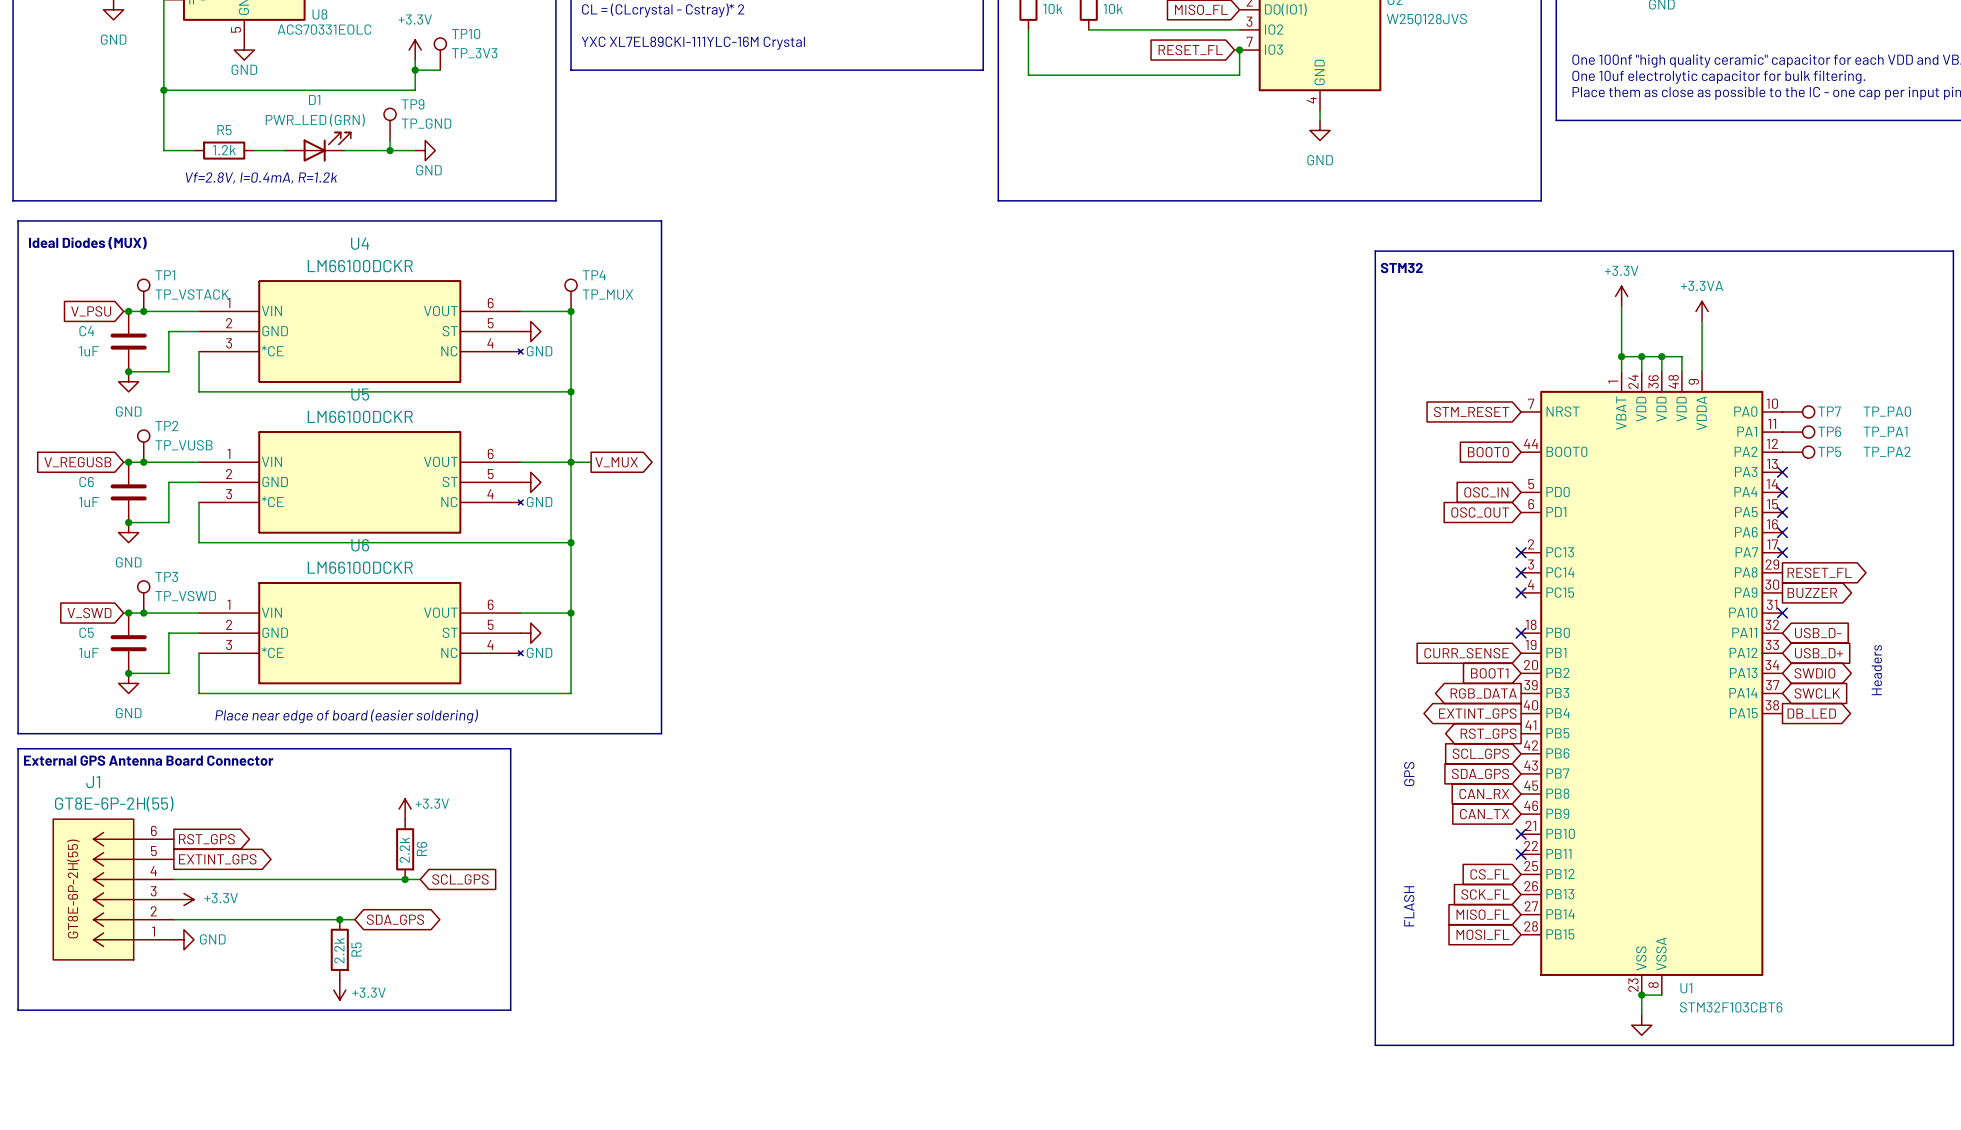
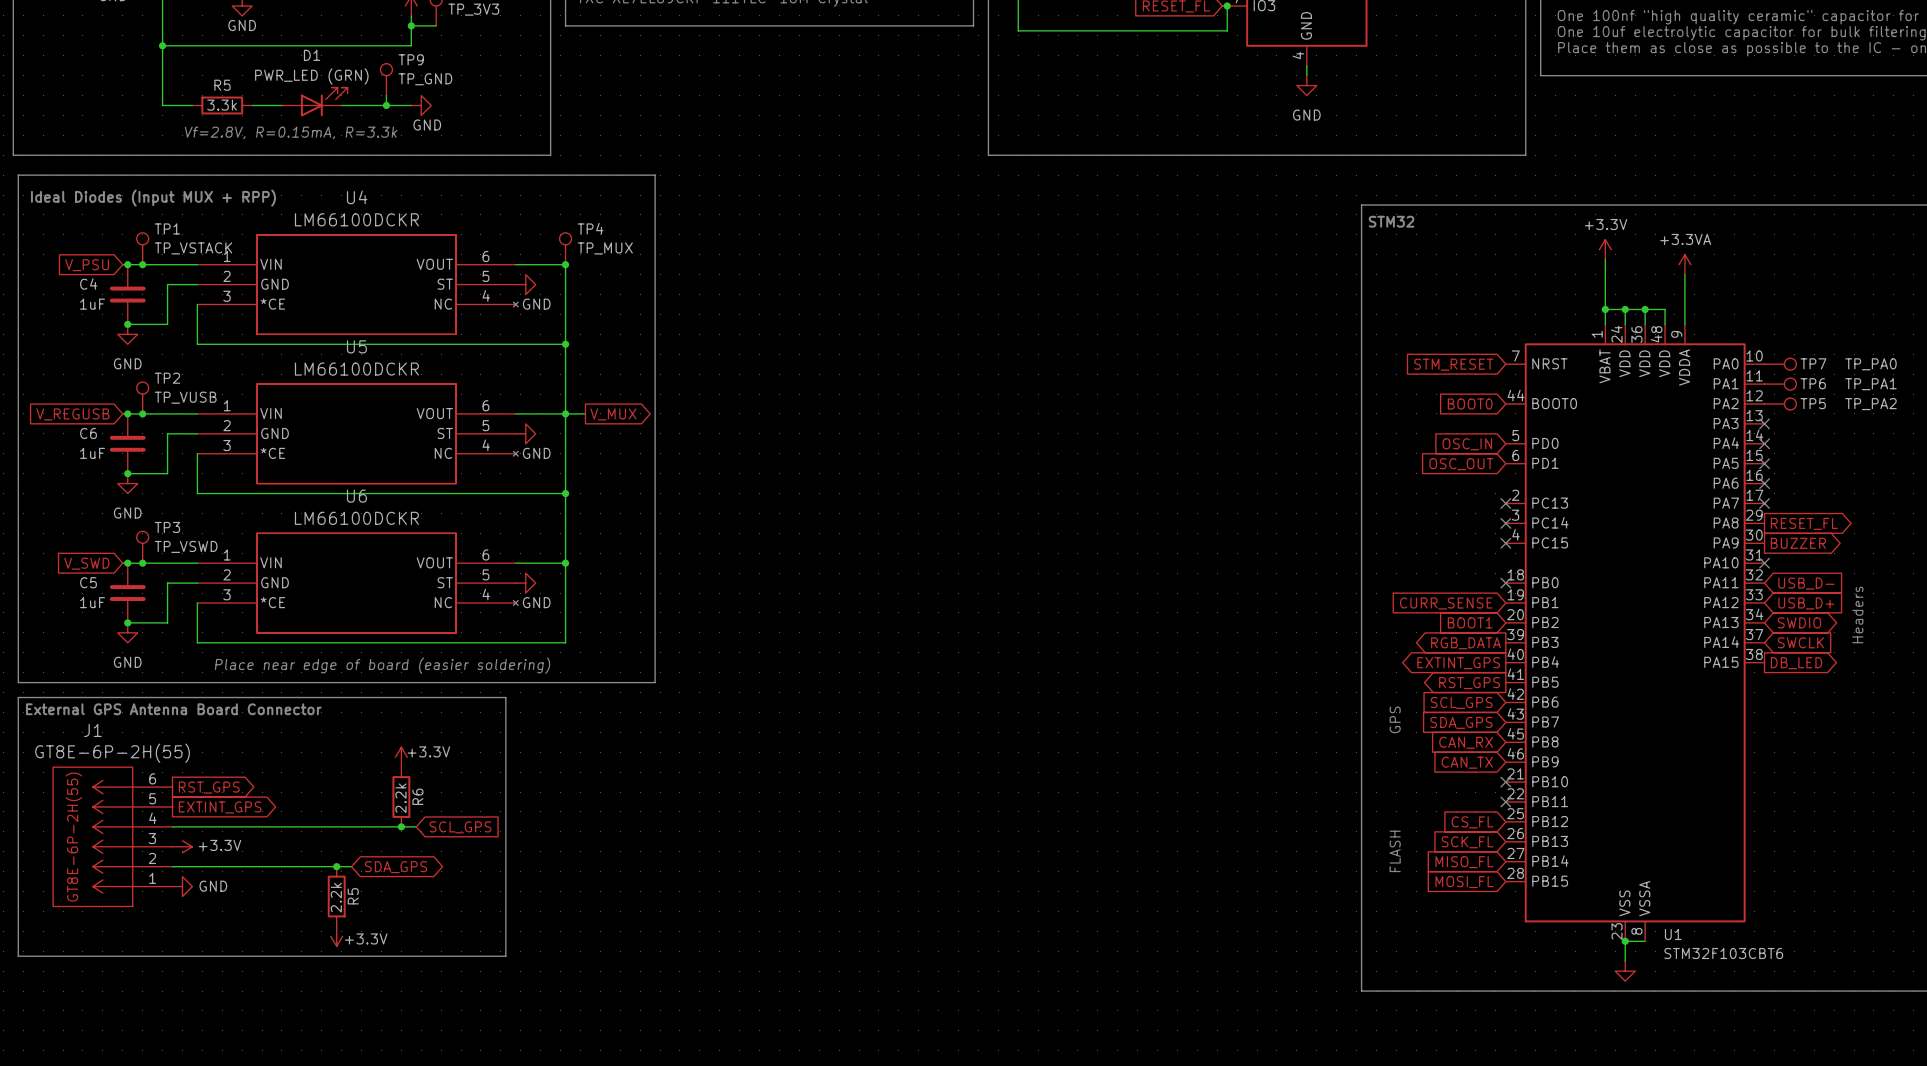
R5 value: 1.2k (224, 150) -> 3.3k (222, 105)
text: Vf=2.8V, I=0.4mA, R=1.2k (261, 178) -> Vf=2.8V, R=0.15mA, R=3.3k (291, 132)
text: Ideal Diodes (MUX) (87, 243) -> Ideal Diodes (Input MUX + RPP) (153, 198)

